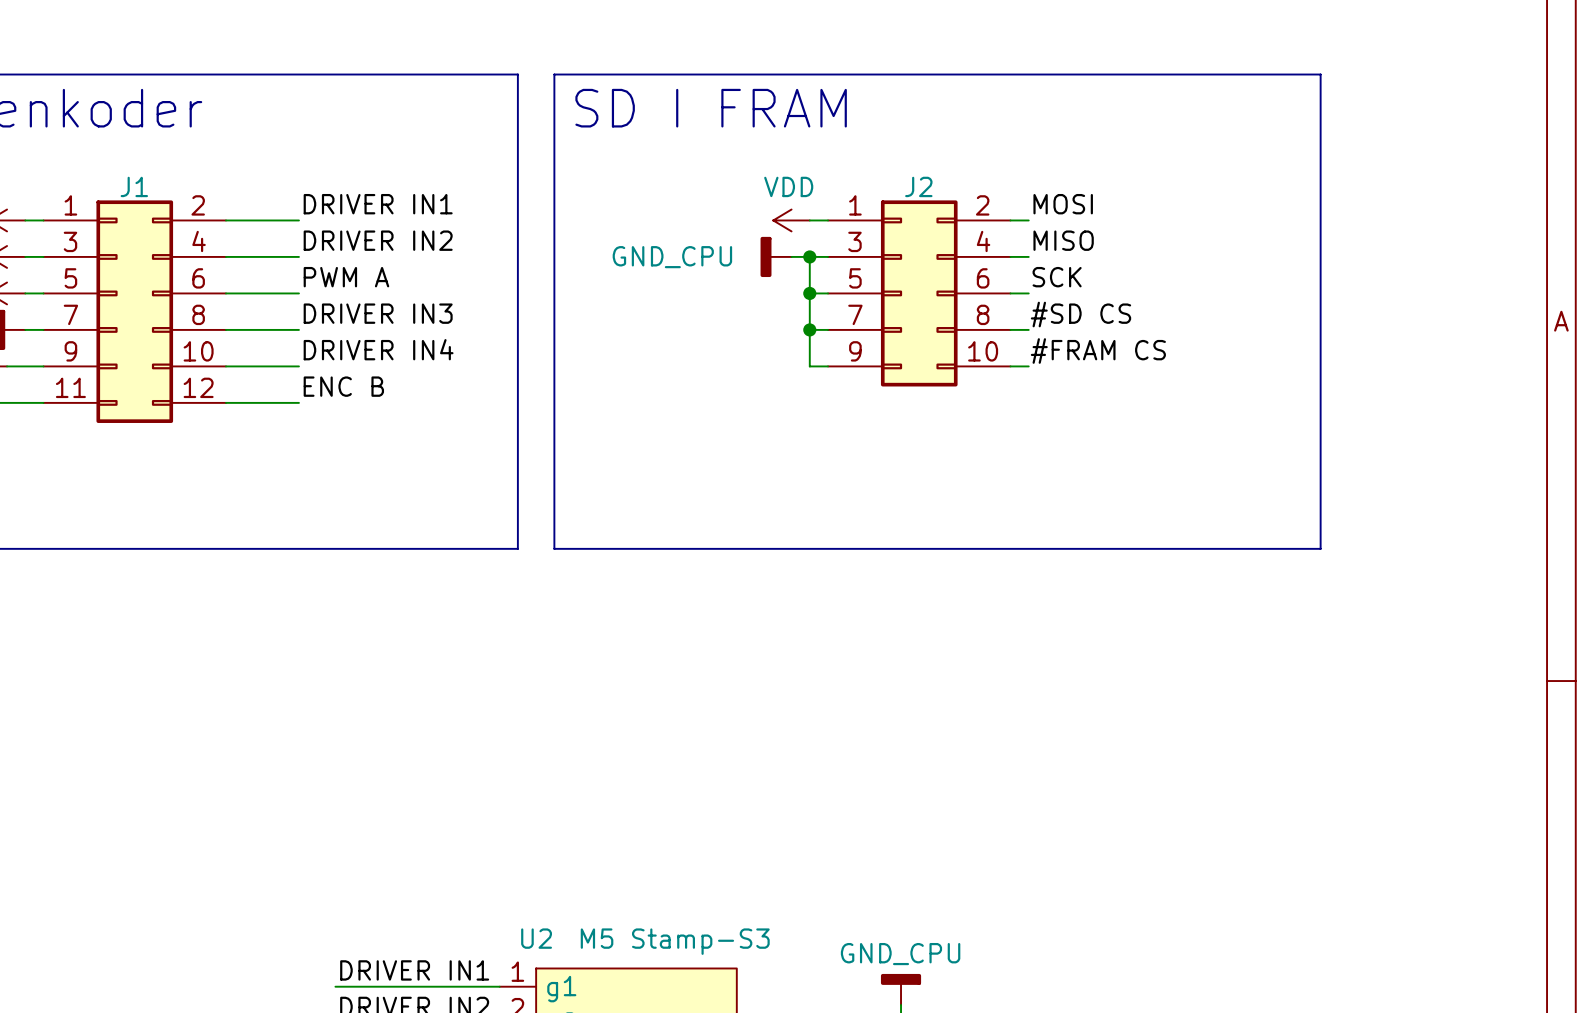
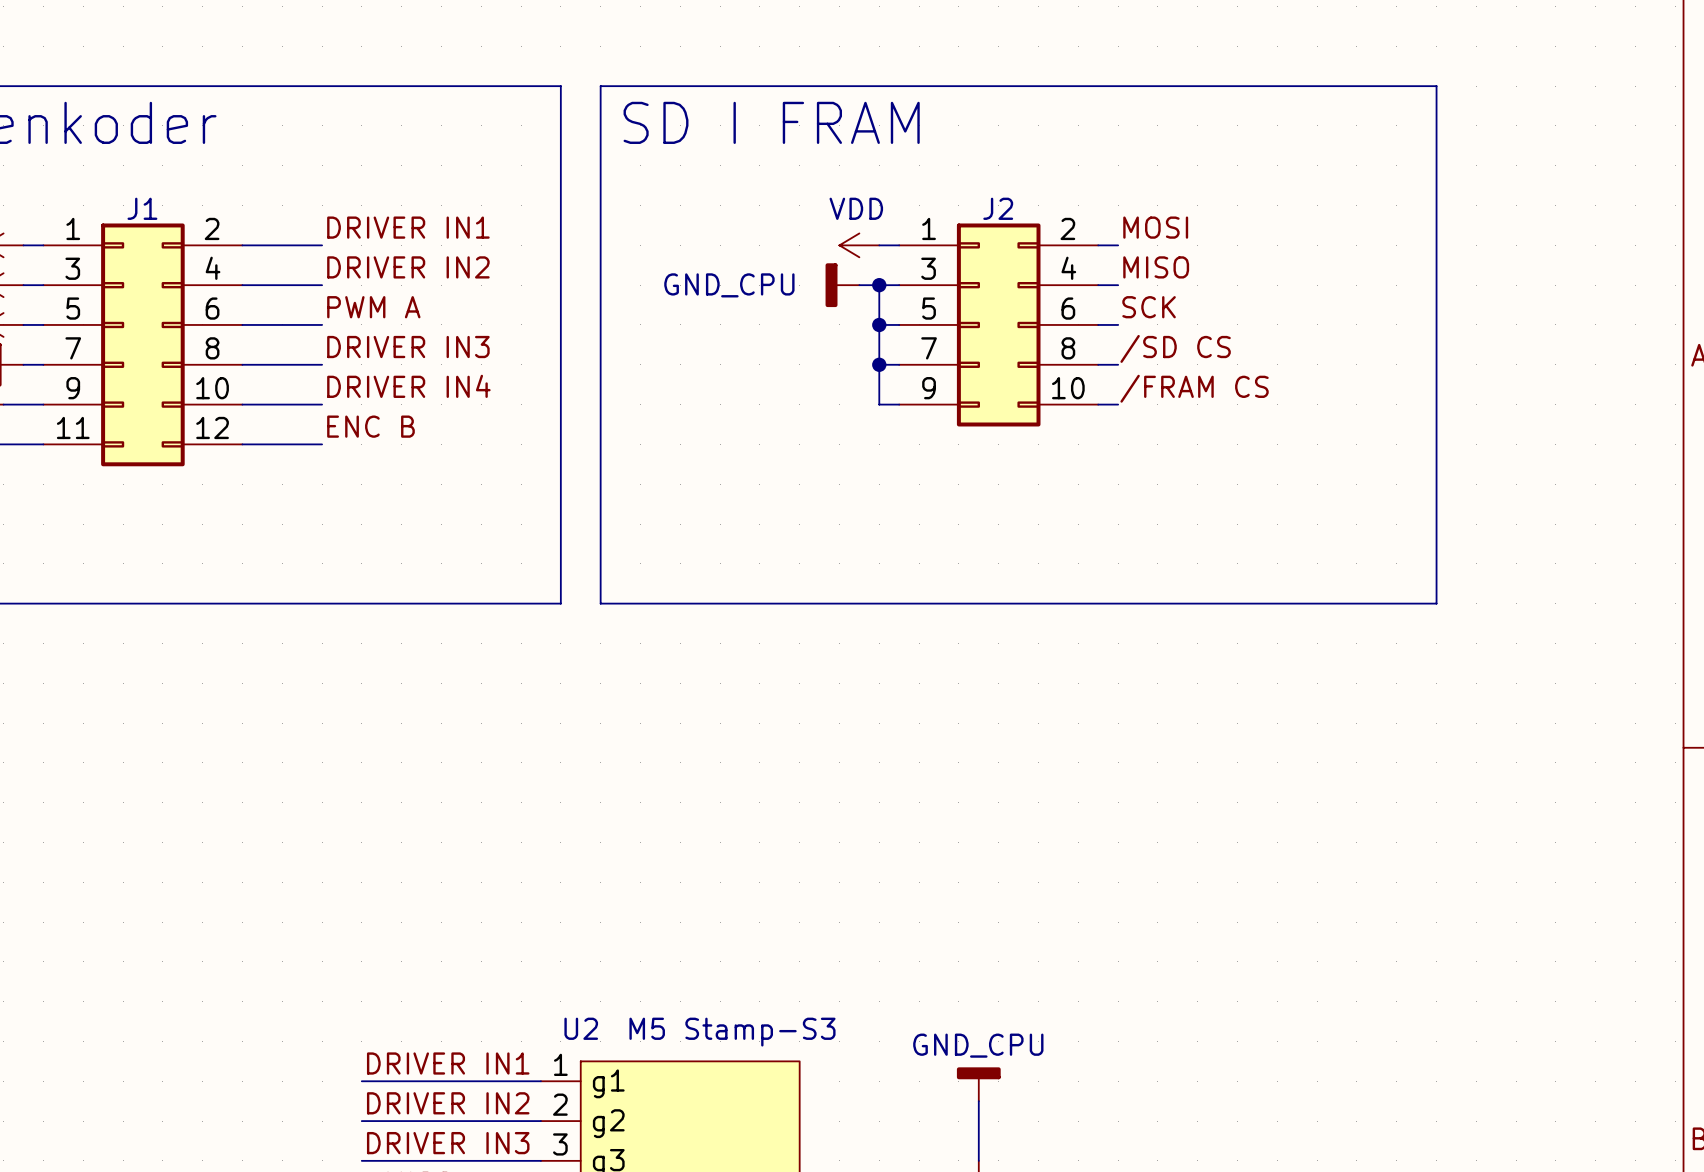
label: #SD CS (1080, 314) -> /SD CS (1175, 348)
label: #FRAM CS (1098, 351) -> /FRAM CS (1194, 388)

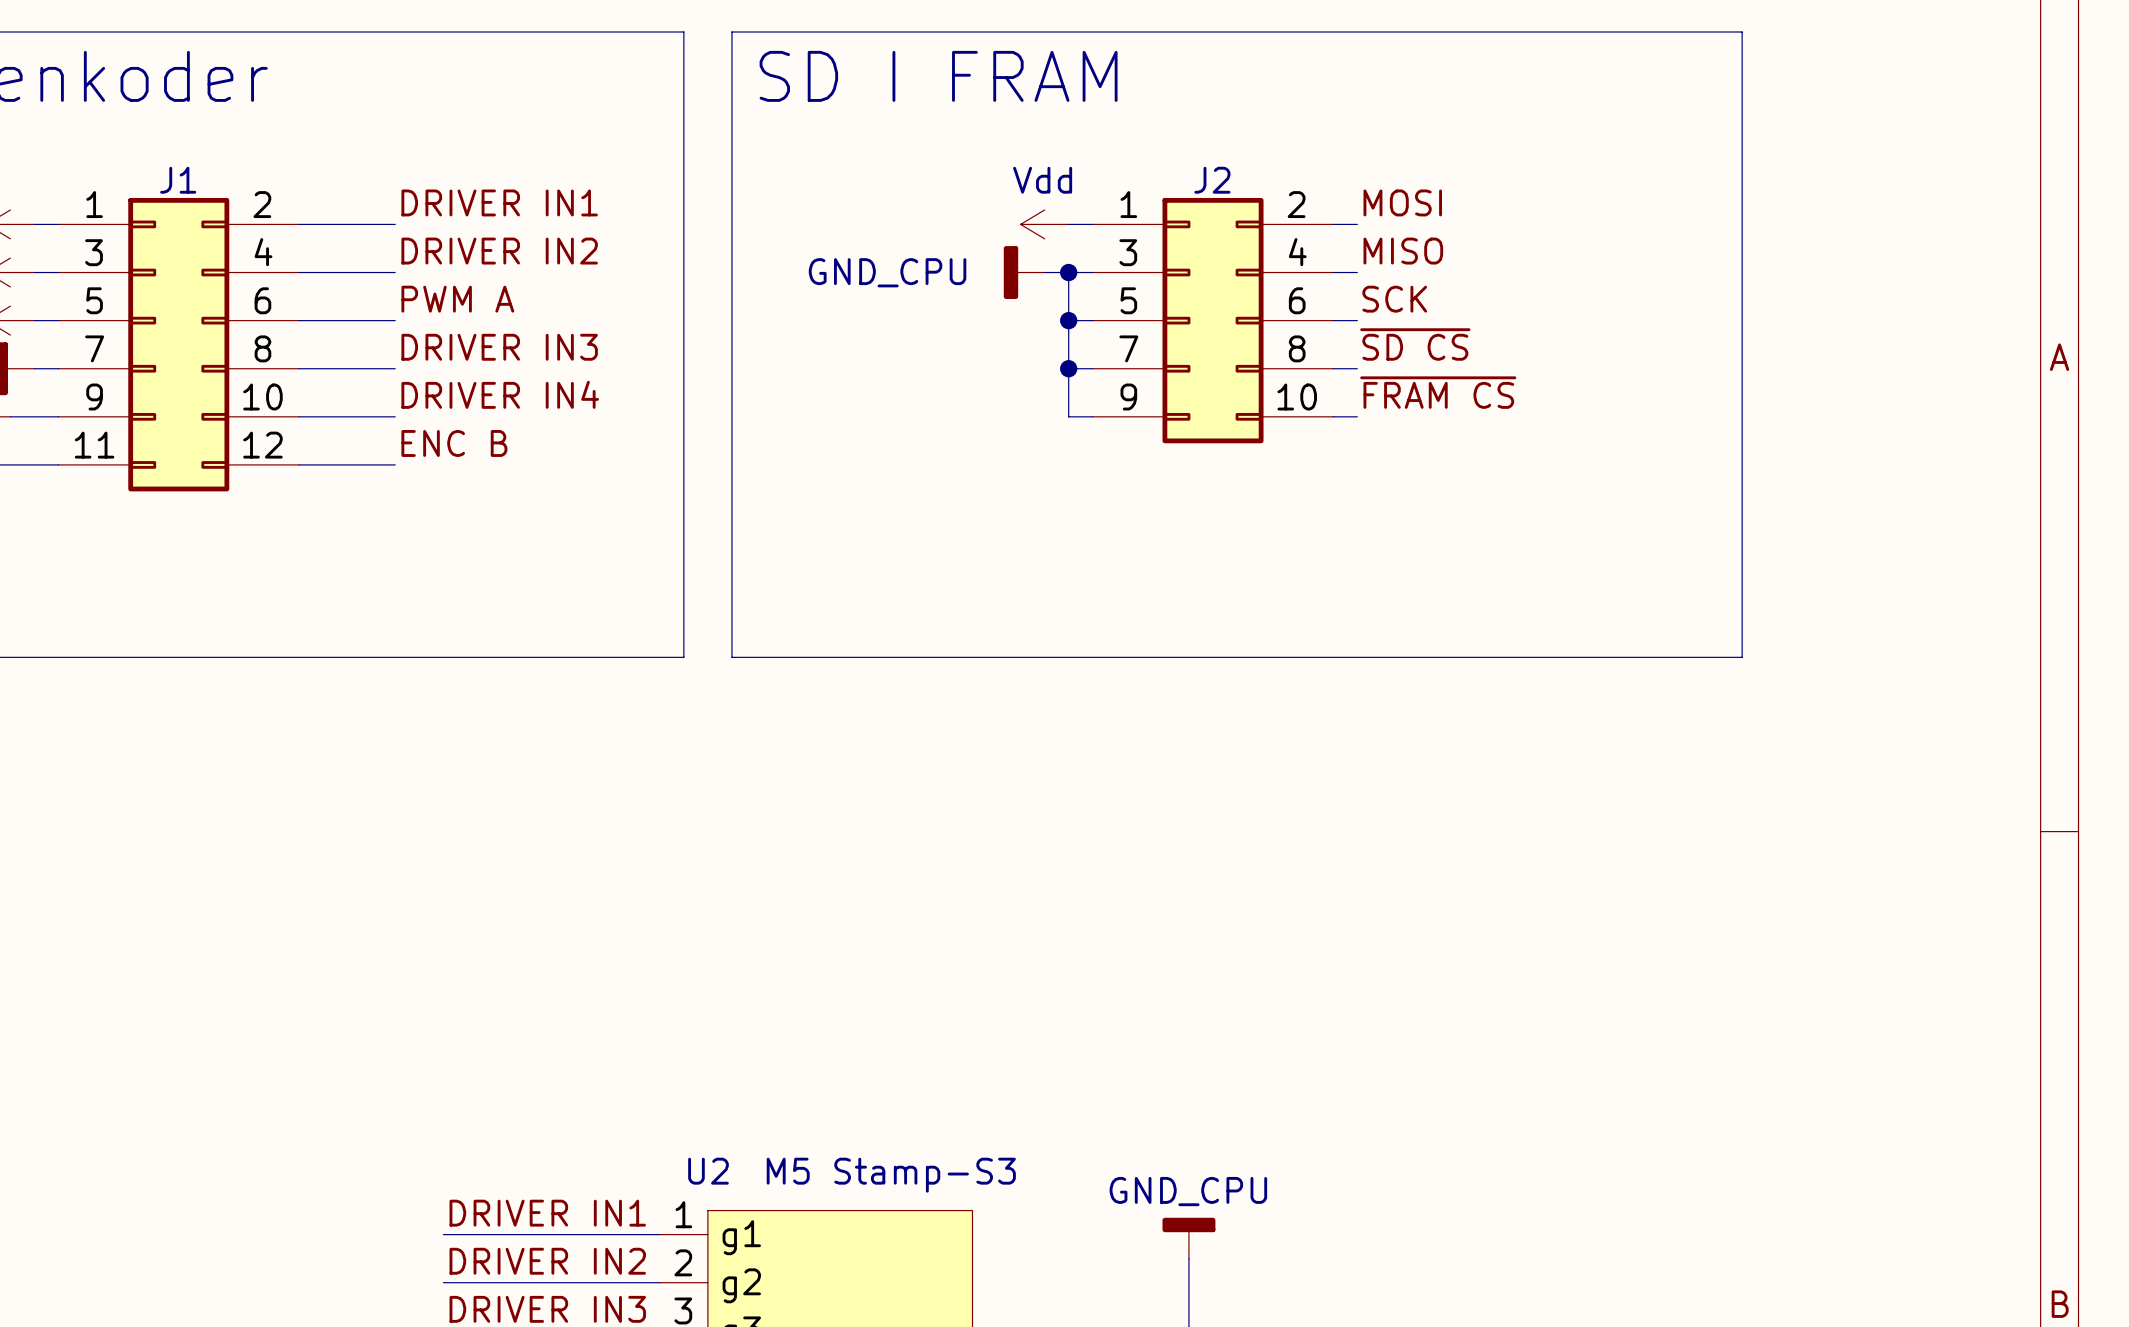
power symbol: VDD (859, 245) -> Vdd (1044, 224)
label: /SD CS (1175, 348) -> ~{SD CS} (1415, 344)
label: /FRAM CS (1194, 388) -> ~{FRAM CS} (1438, 392)

